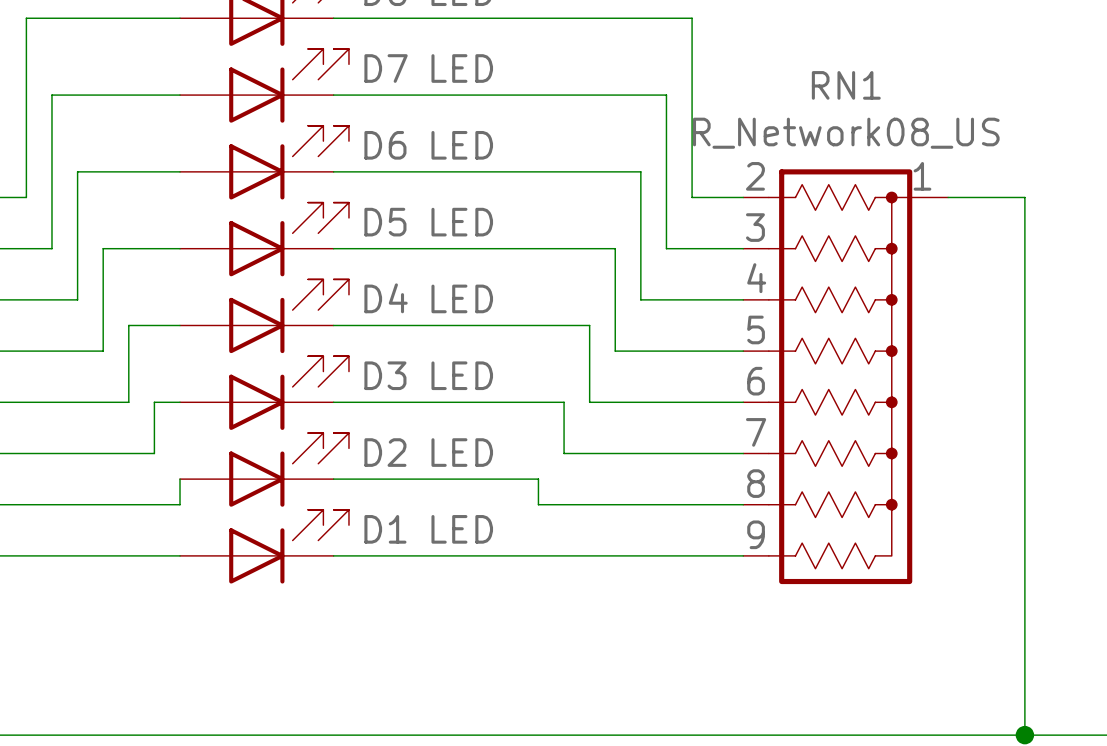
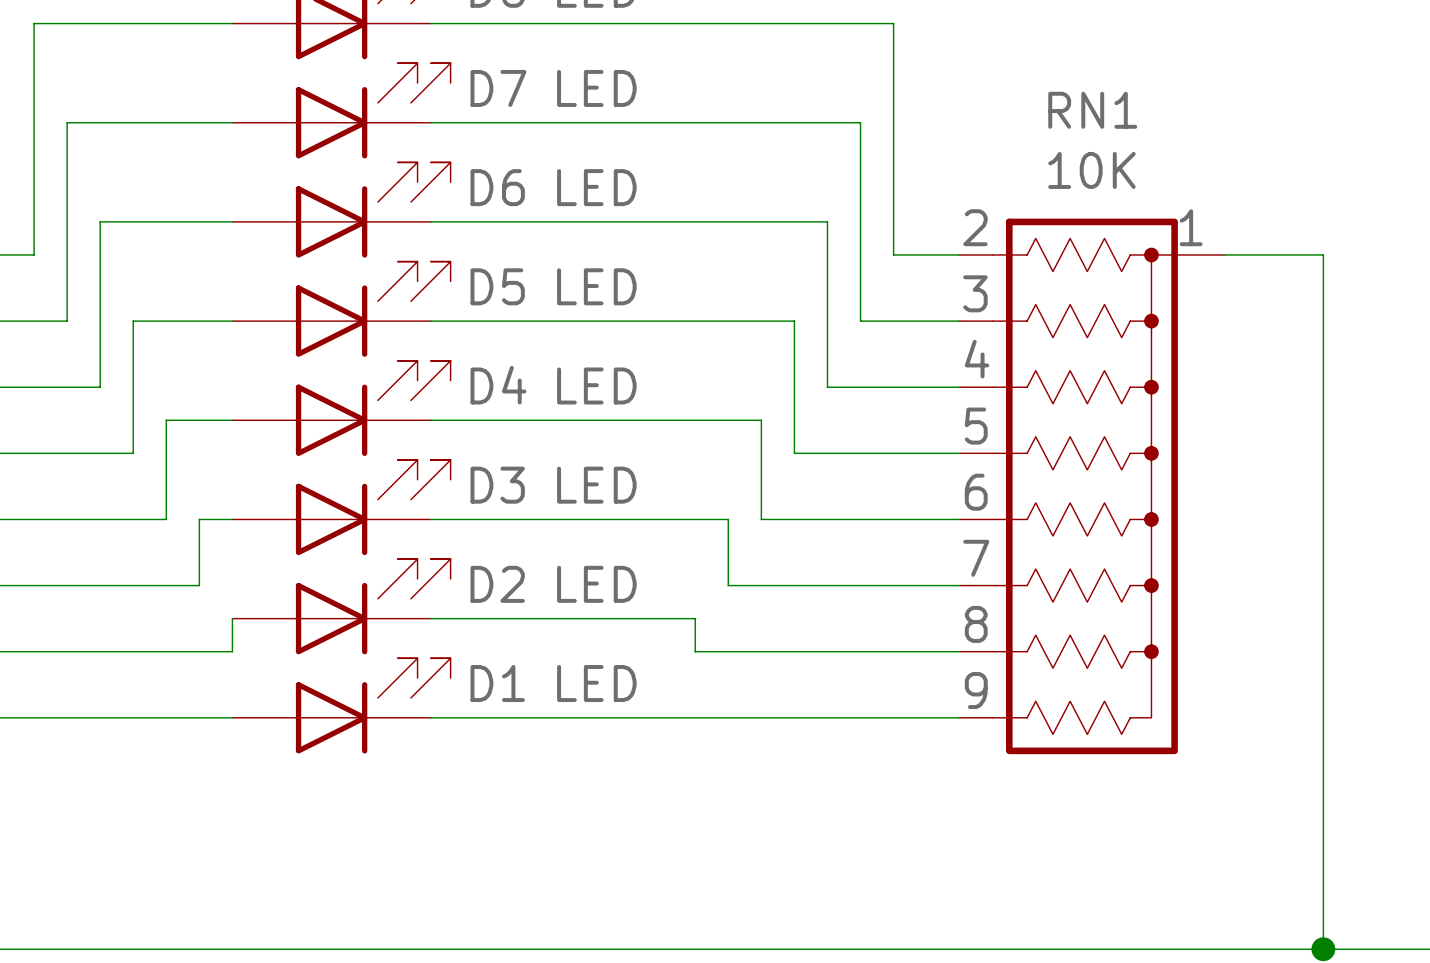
RN1 value: R_Network08_US (846, 133) -> 10K (1091, 170)

